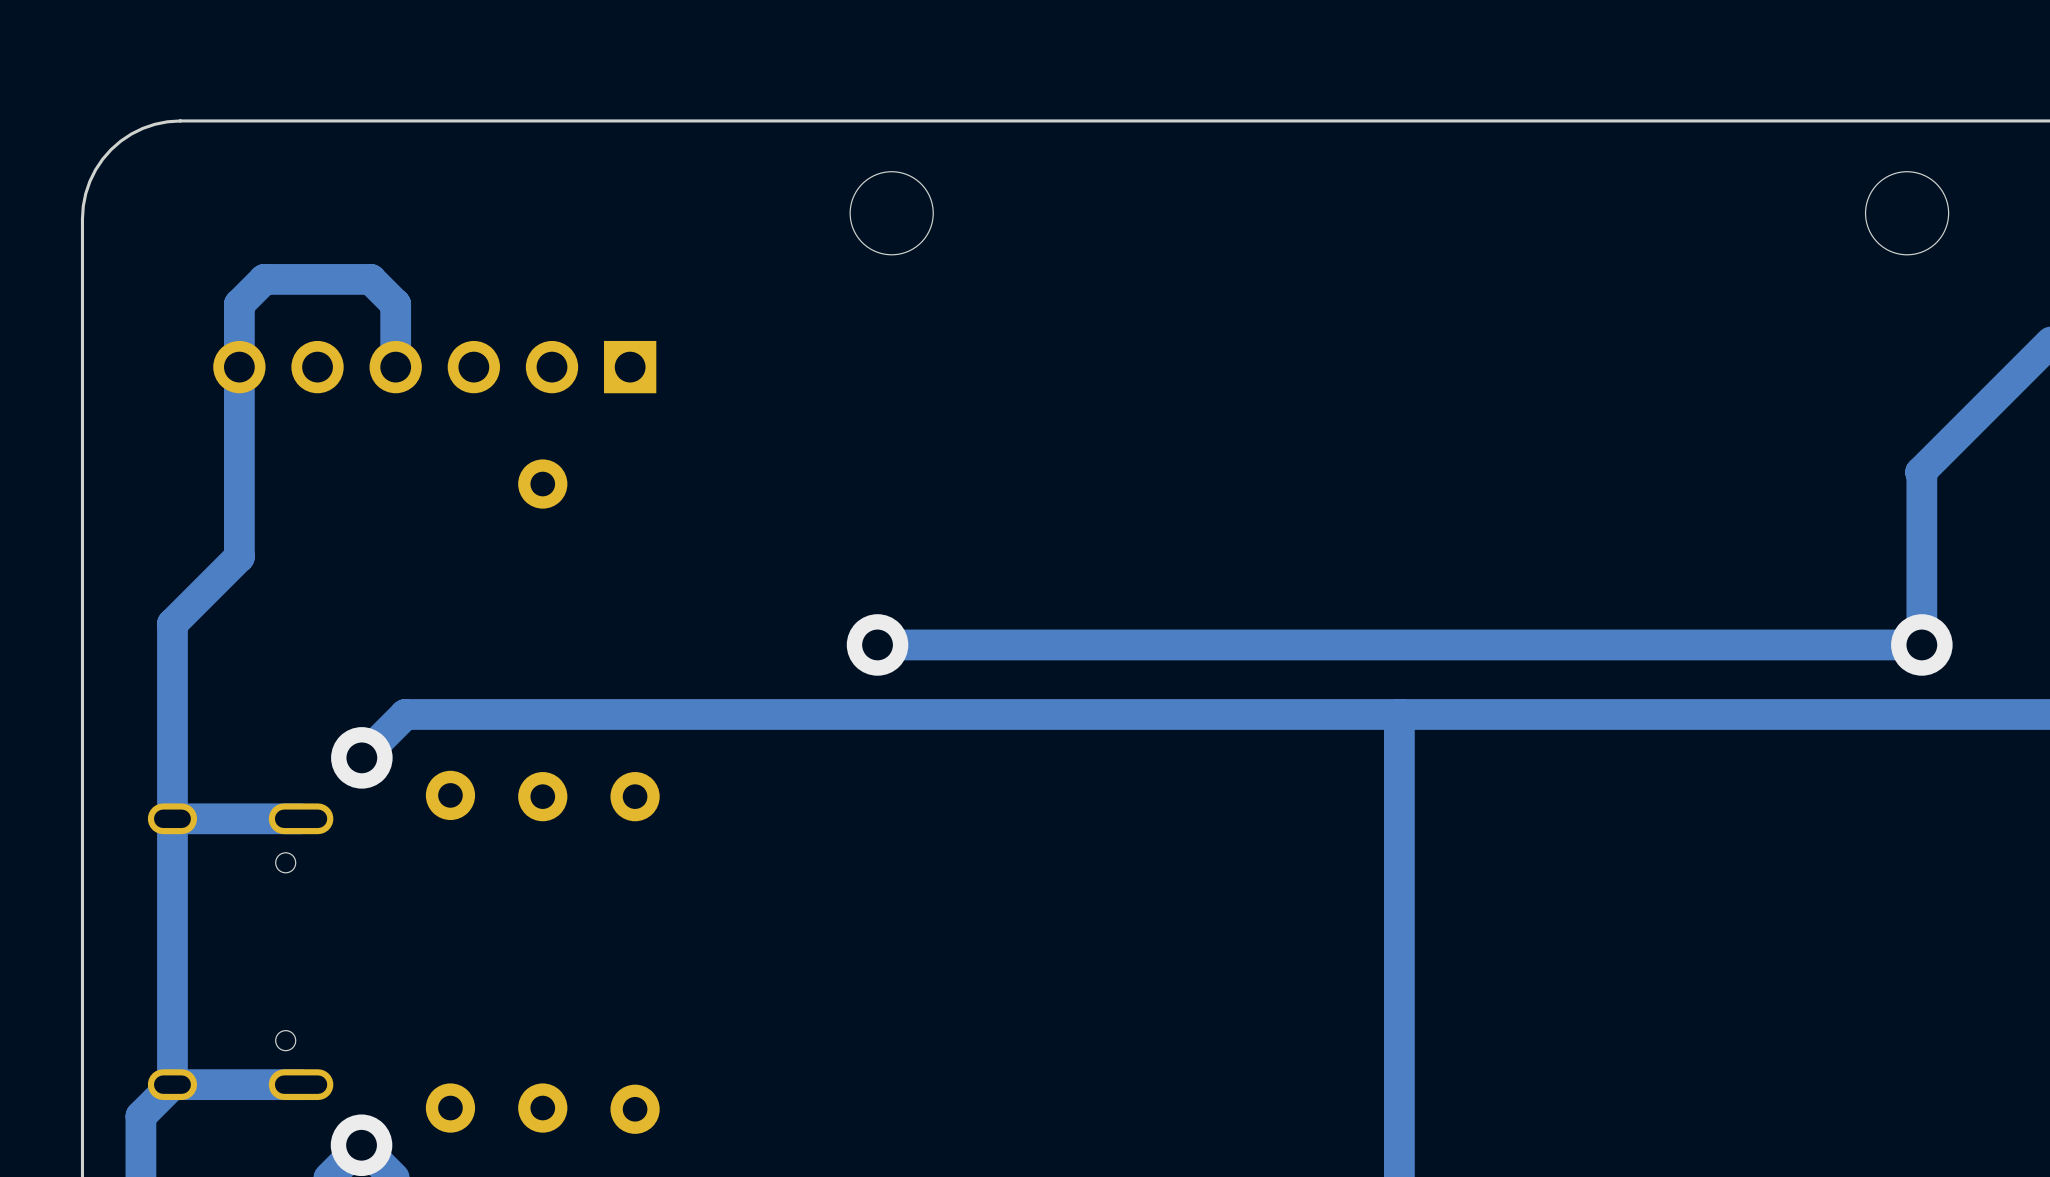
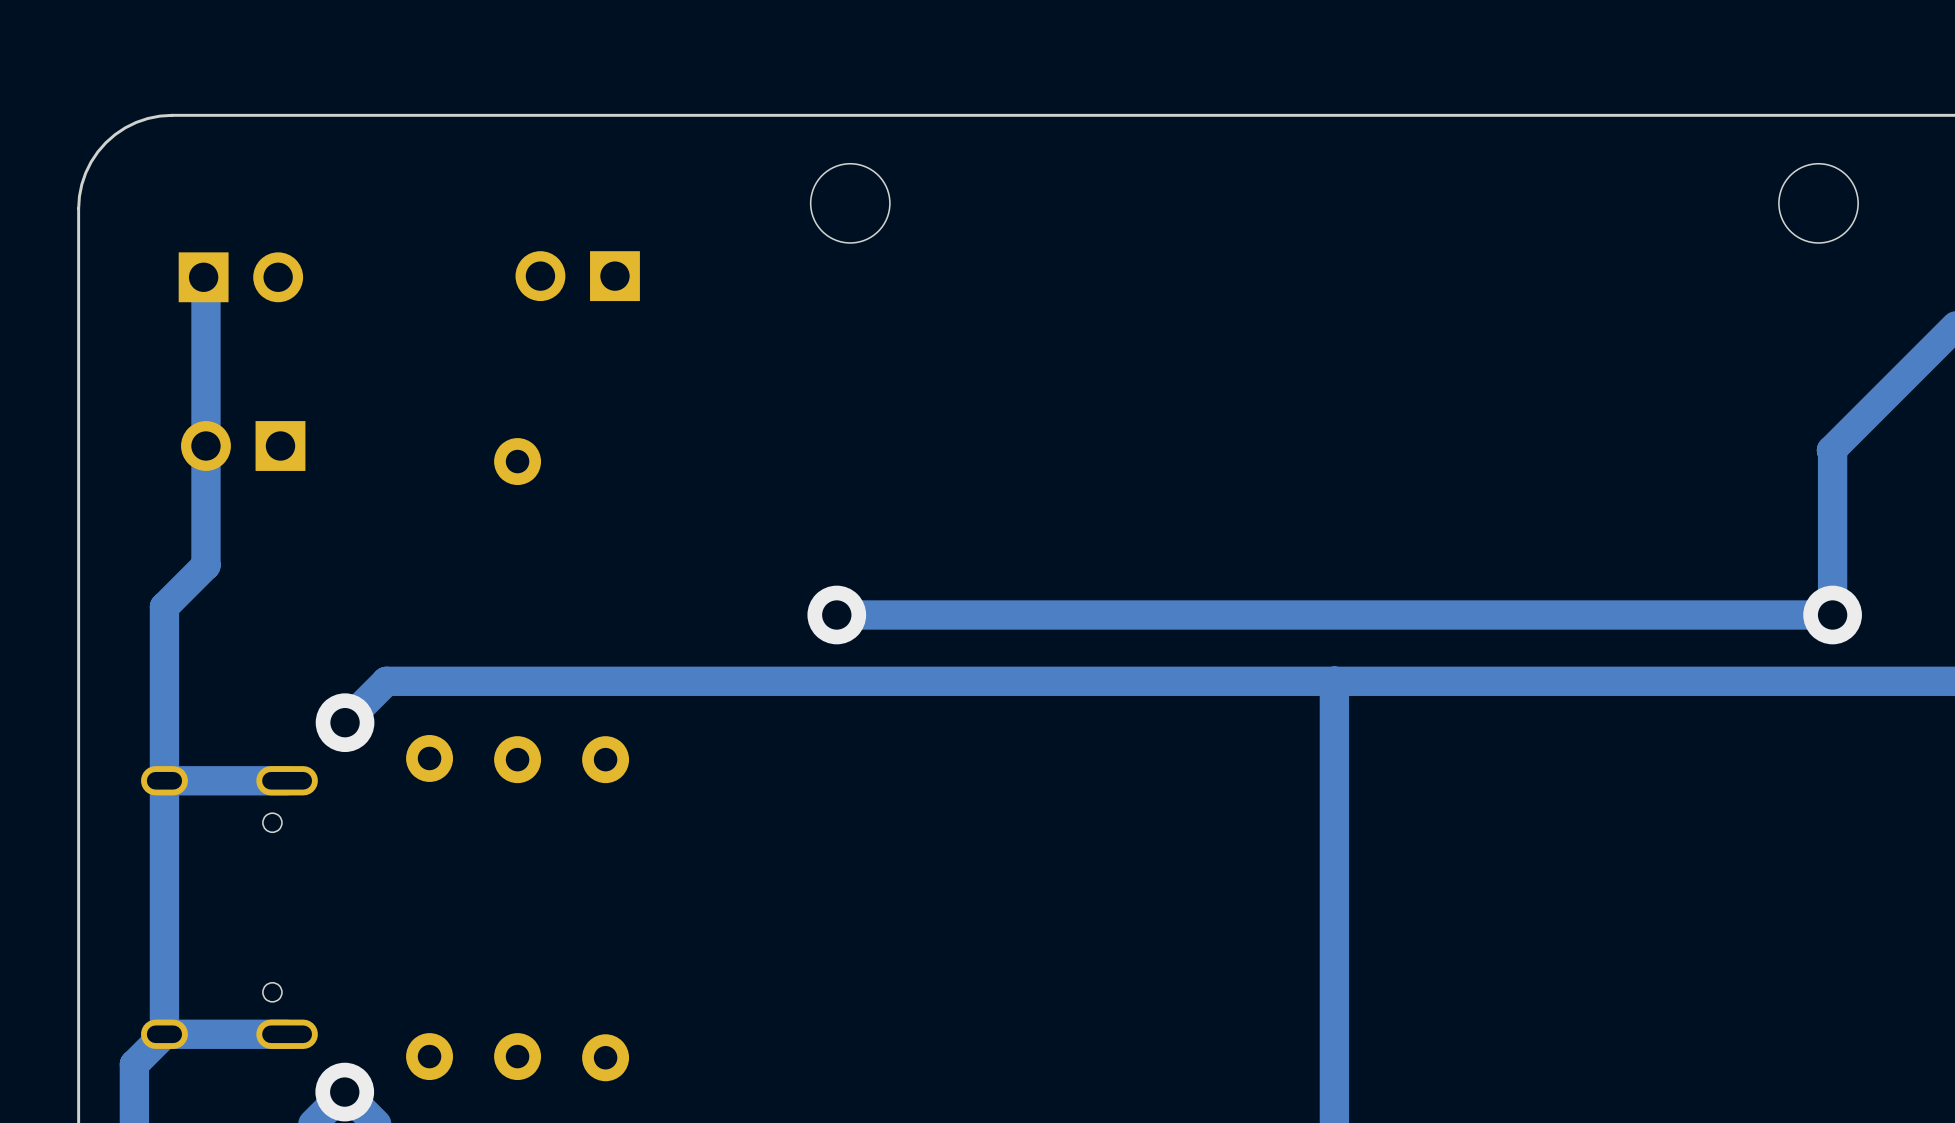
part: none -> (577, 276)
part: none -> (240, 277)
track: (395, 367) (395, 304) (370, 279) (264, 279) (239, 304) (239, 556) (172, 623) (172, 636) -> (203, 277) (205, 279) (205, 565) (164, 606)
part: (434, 367) -> none
part: none -> (243, 446)

